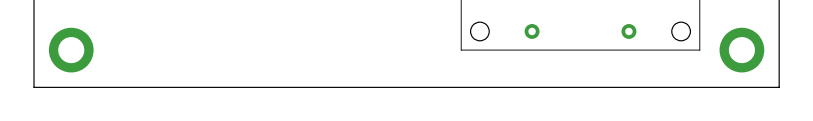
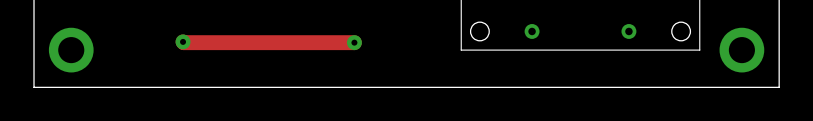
track: none -> (183, 41) (354, 42)
via: none -> (183, 41)
via: none -> (354, 42)

